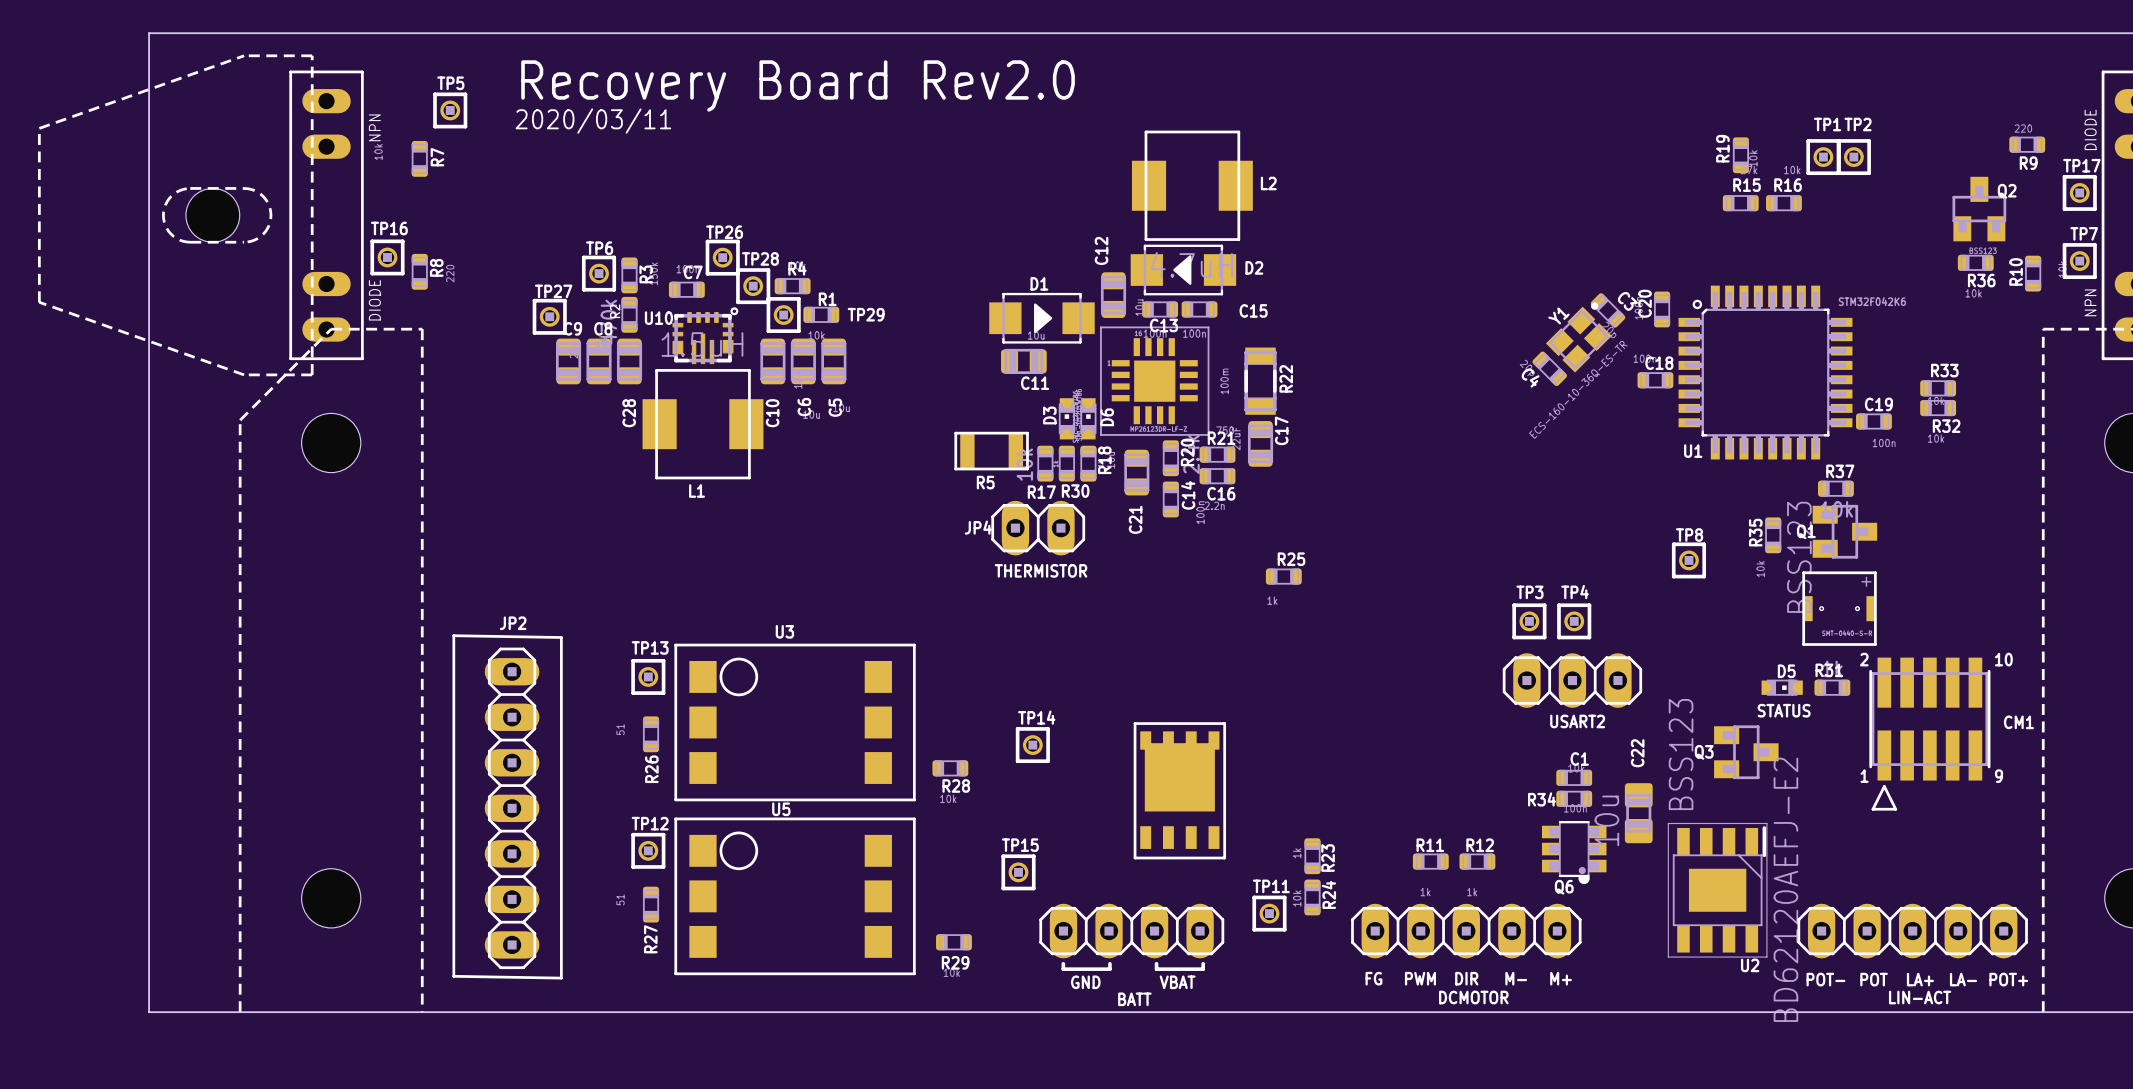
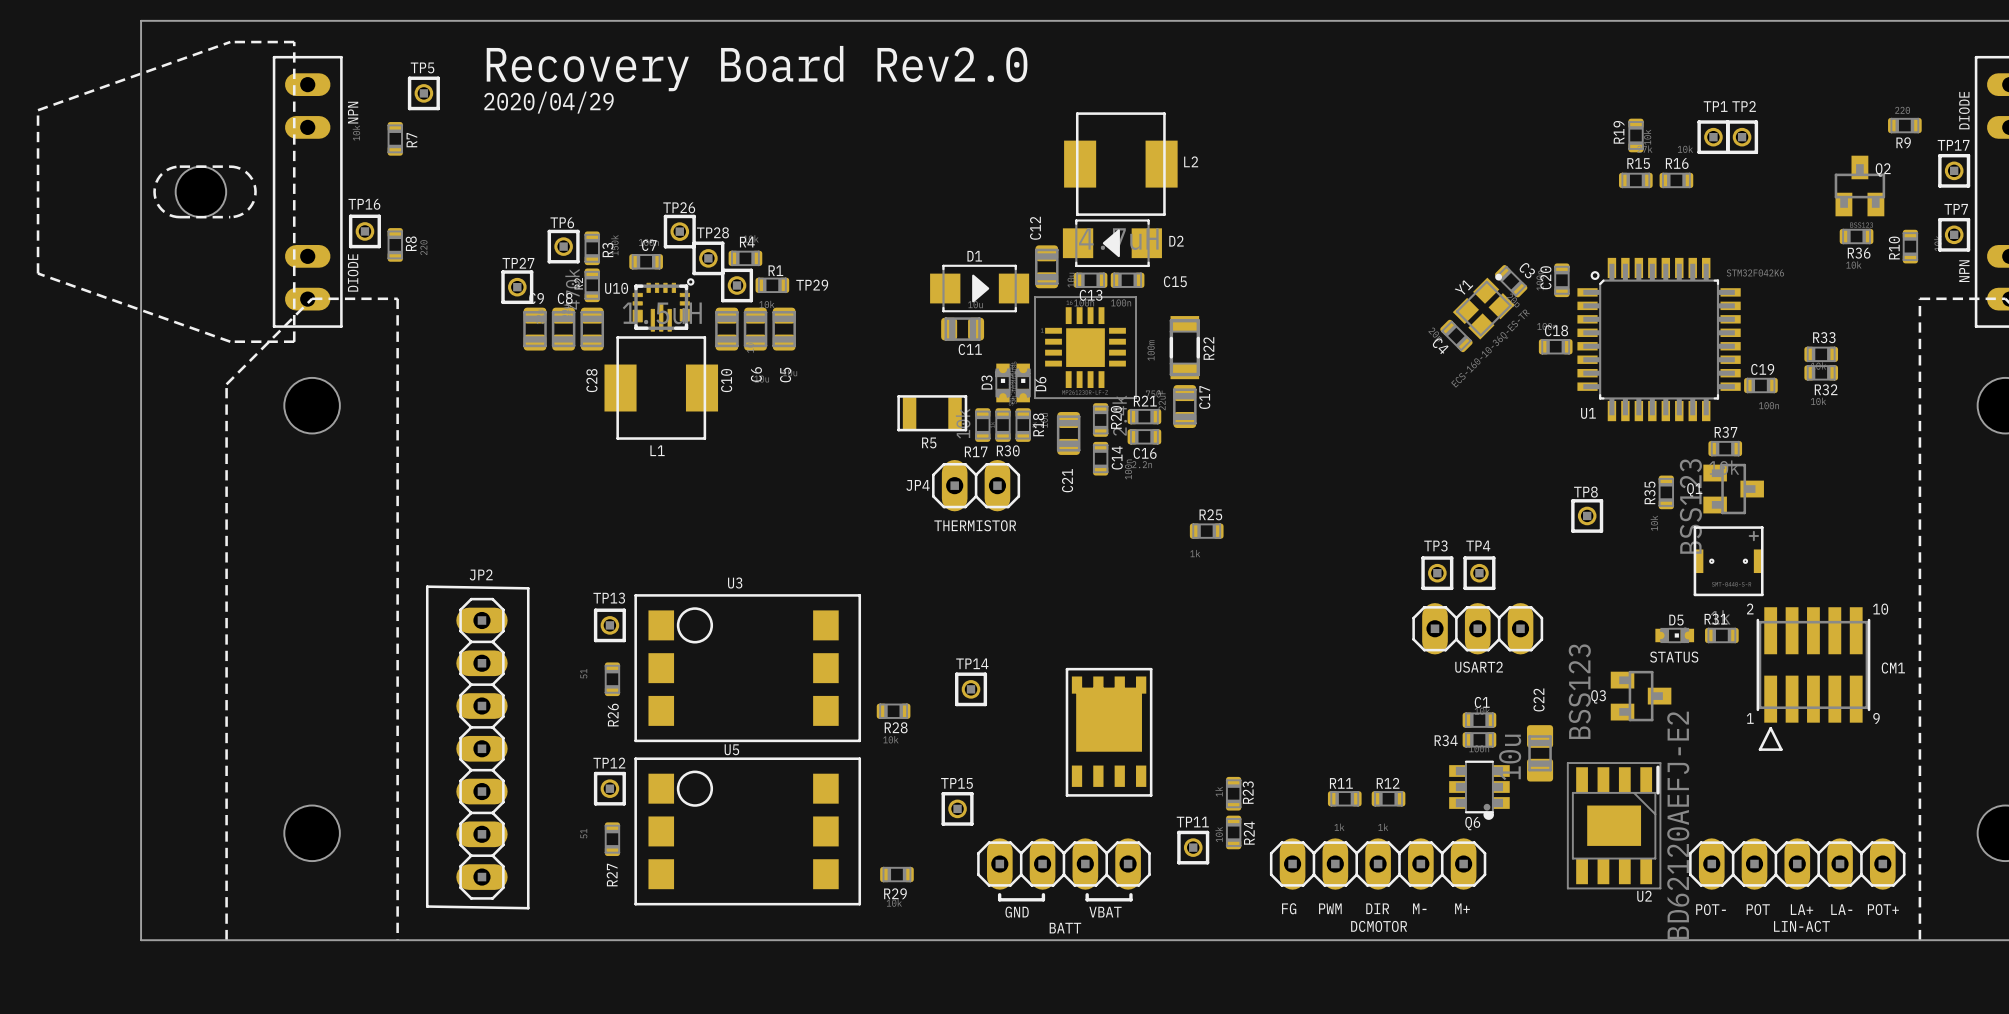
text: 2020/03/11 (593, 121) -> 2020/04/29 (548, 102)

